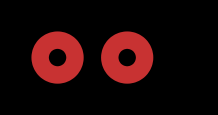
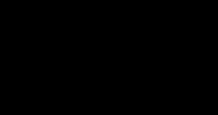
part: (57, 57) -> none
part: (127, 57) -> none

